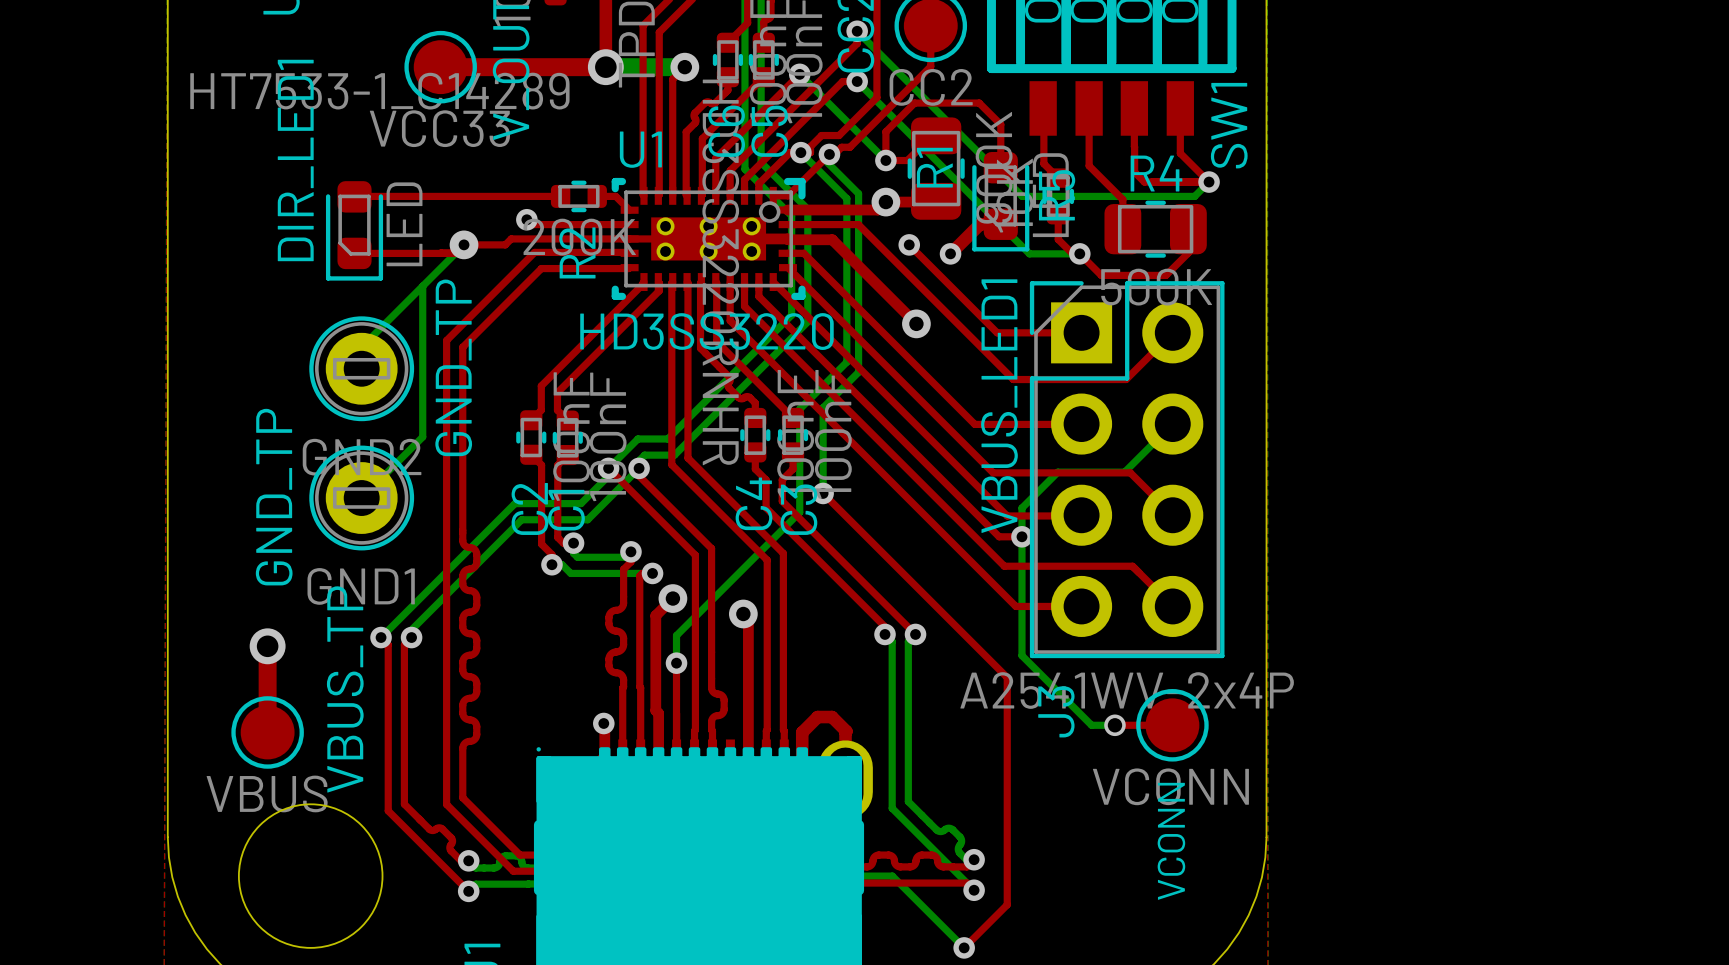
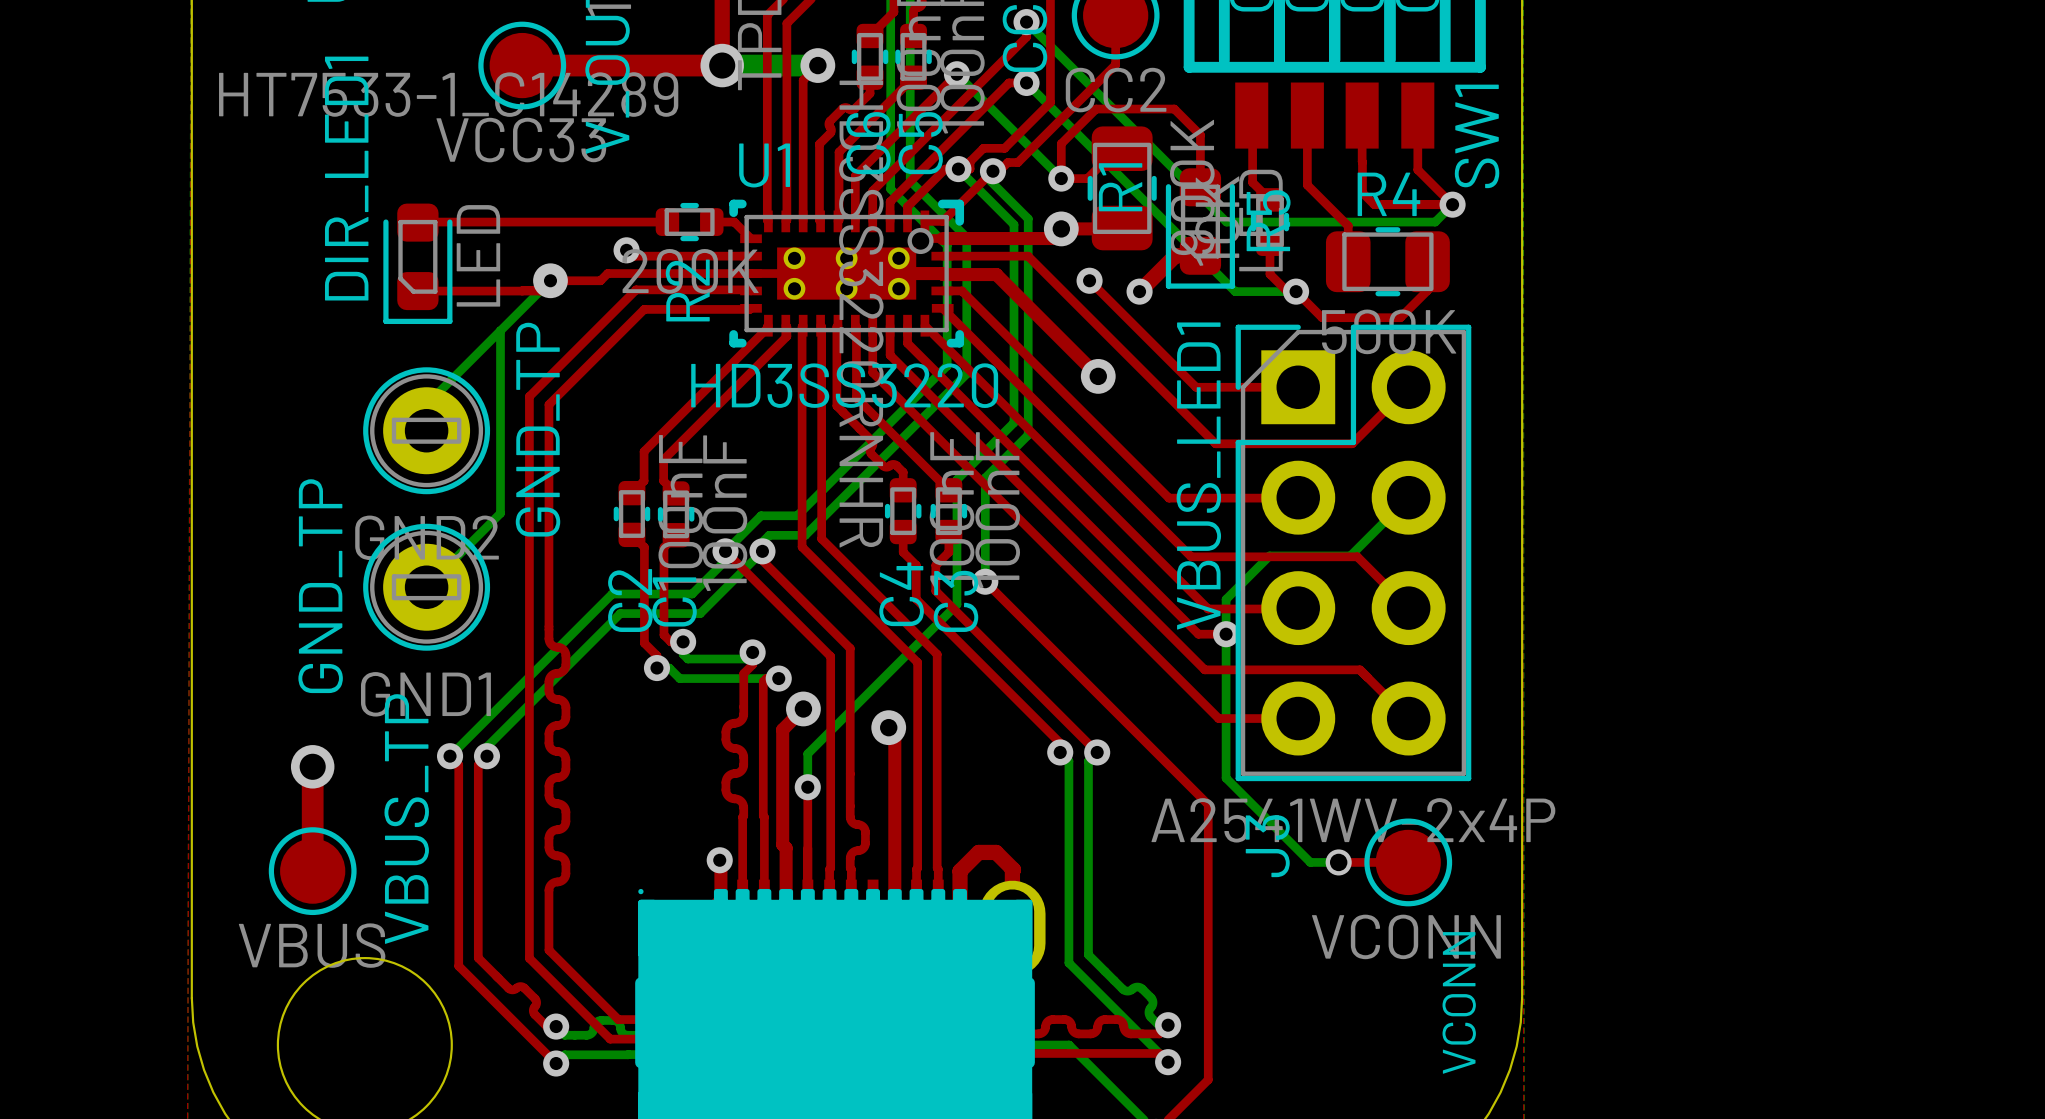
VCONN name position: VCONN (1171, 841) -> VCONN (1459, 1002)

